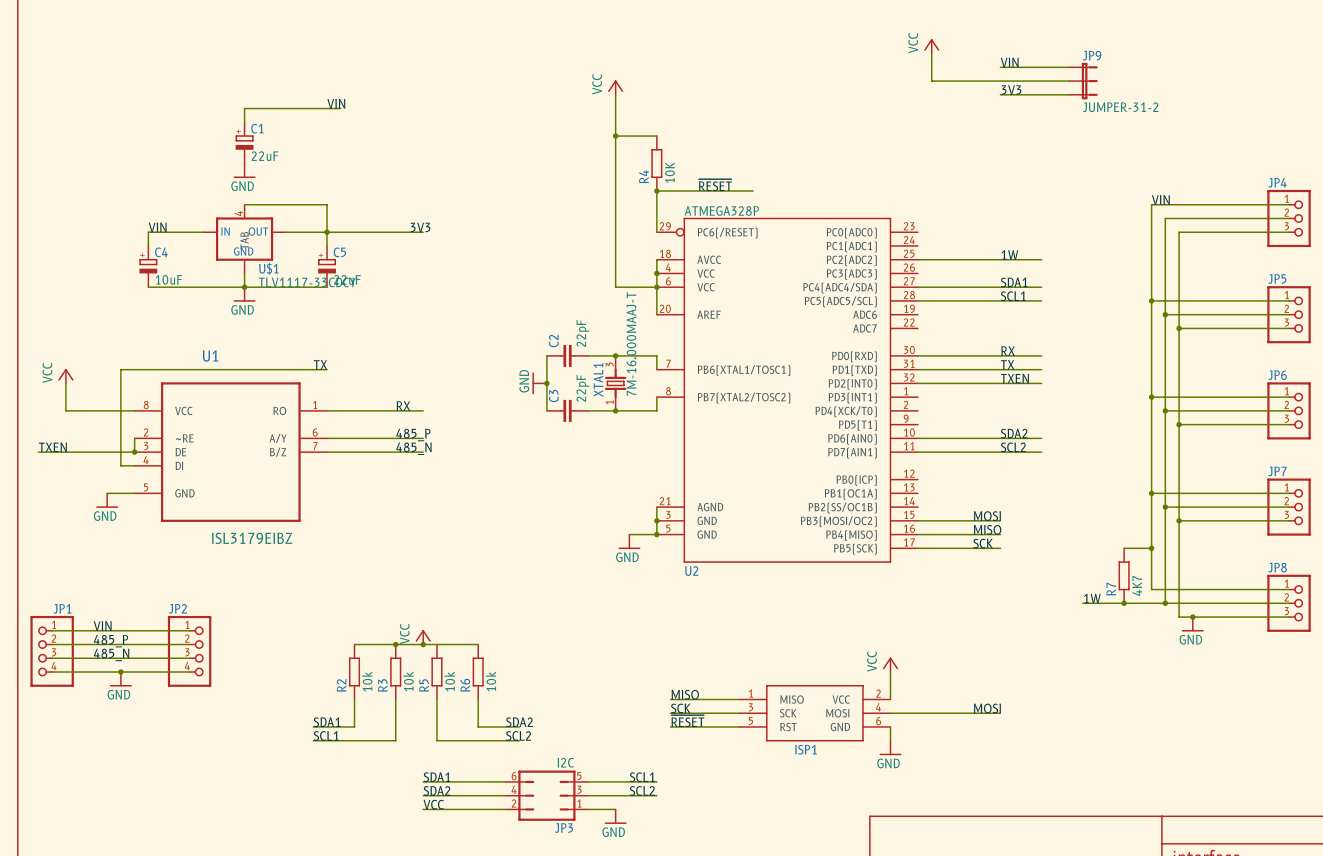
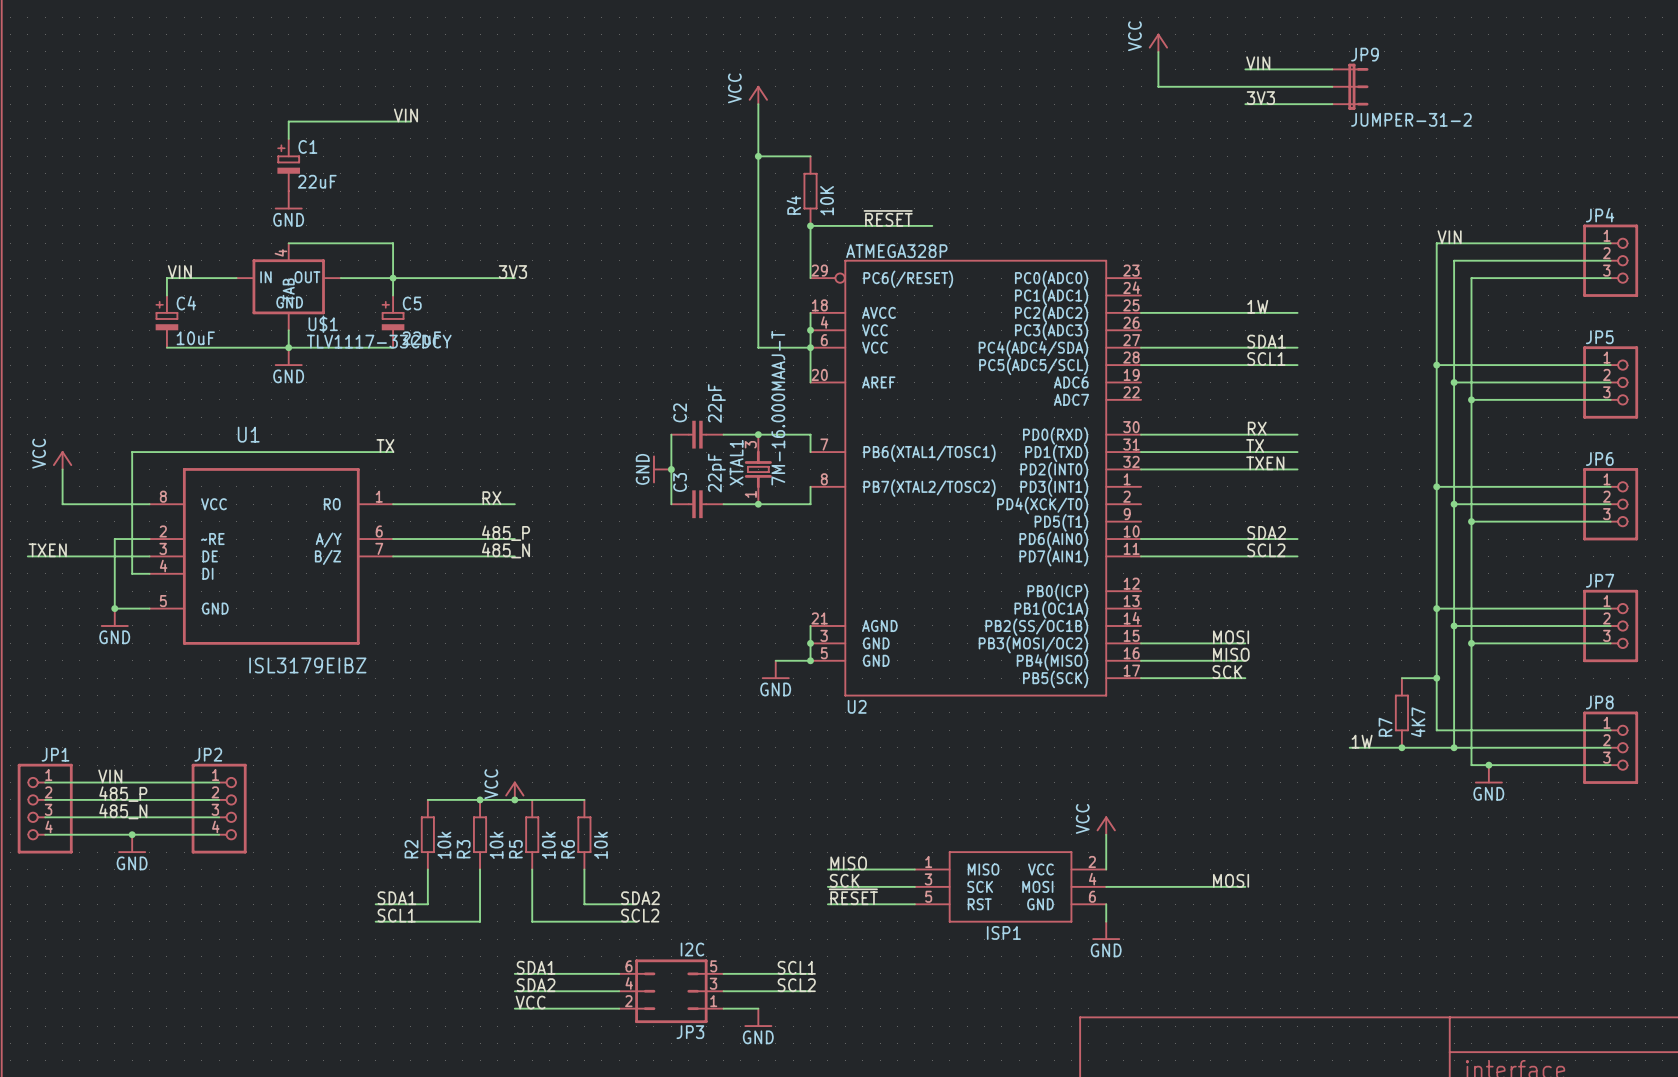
wire: (134, 438) (134, 452) -> (149, 539) (114, 539) (114, 608)
junction: (134, 452) -> none
junction: none -> (114, 608)

